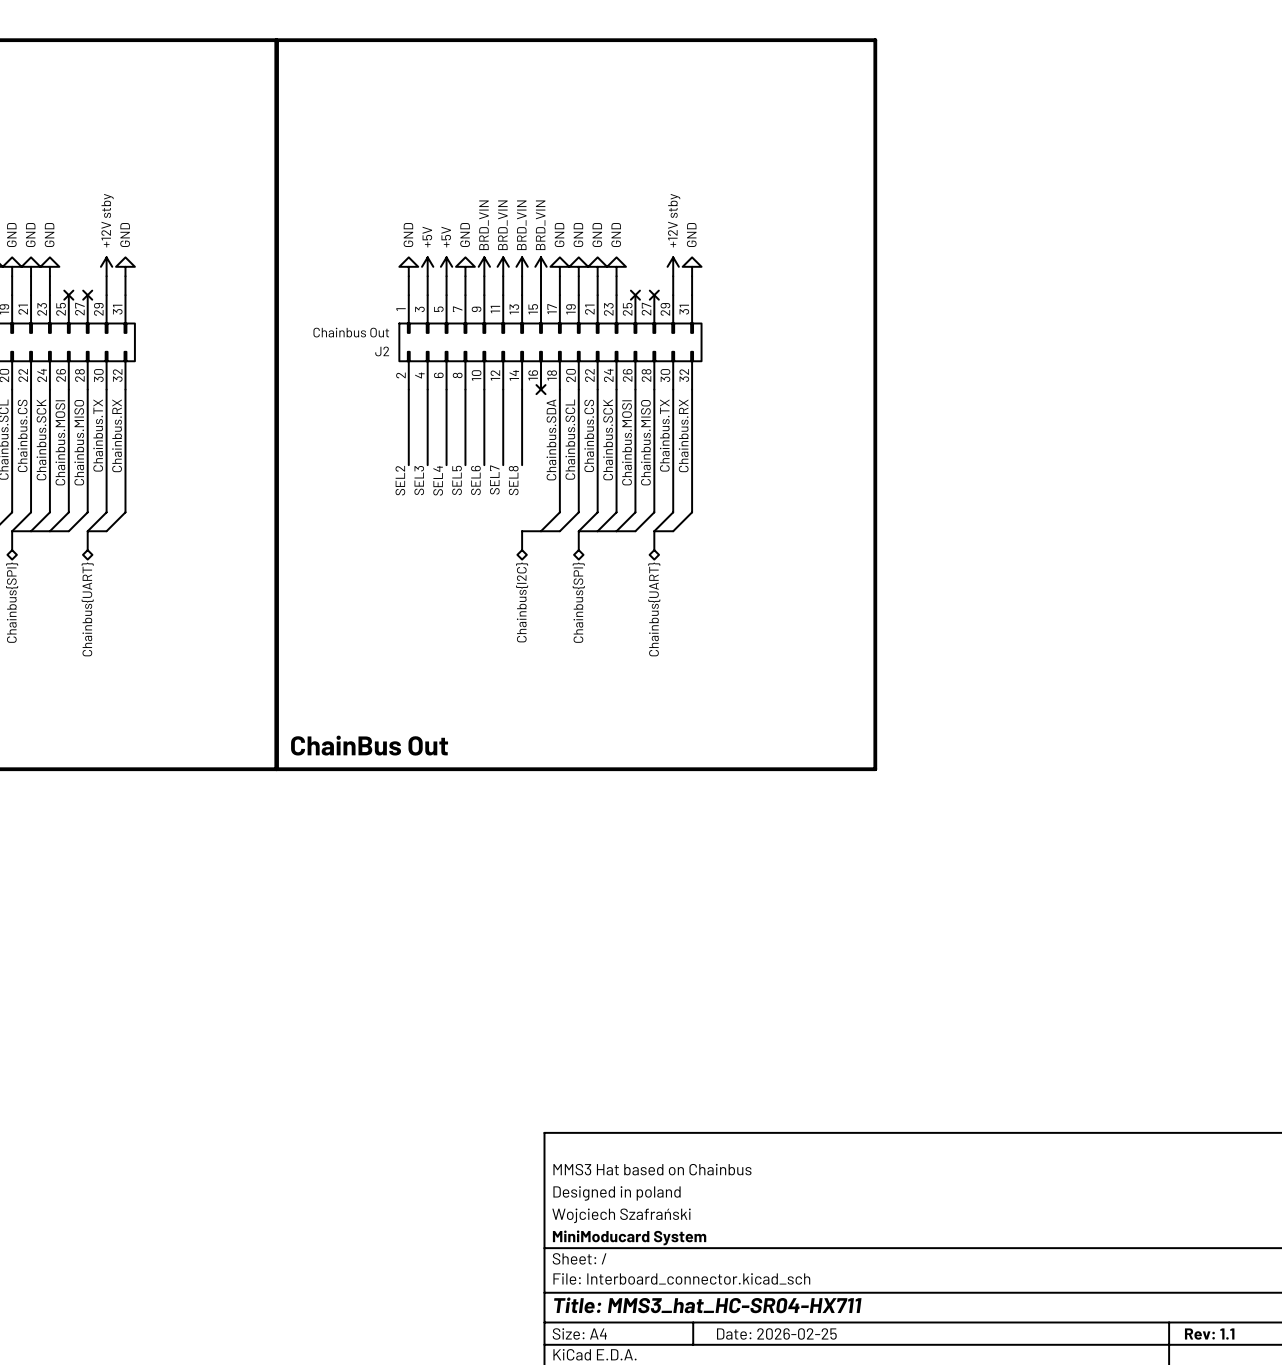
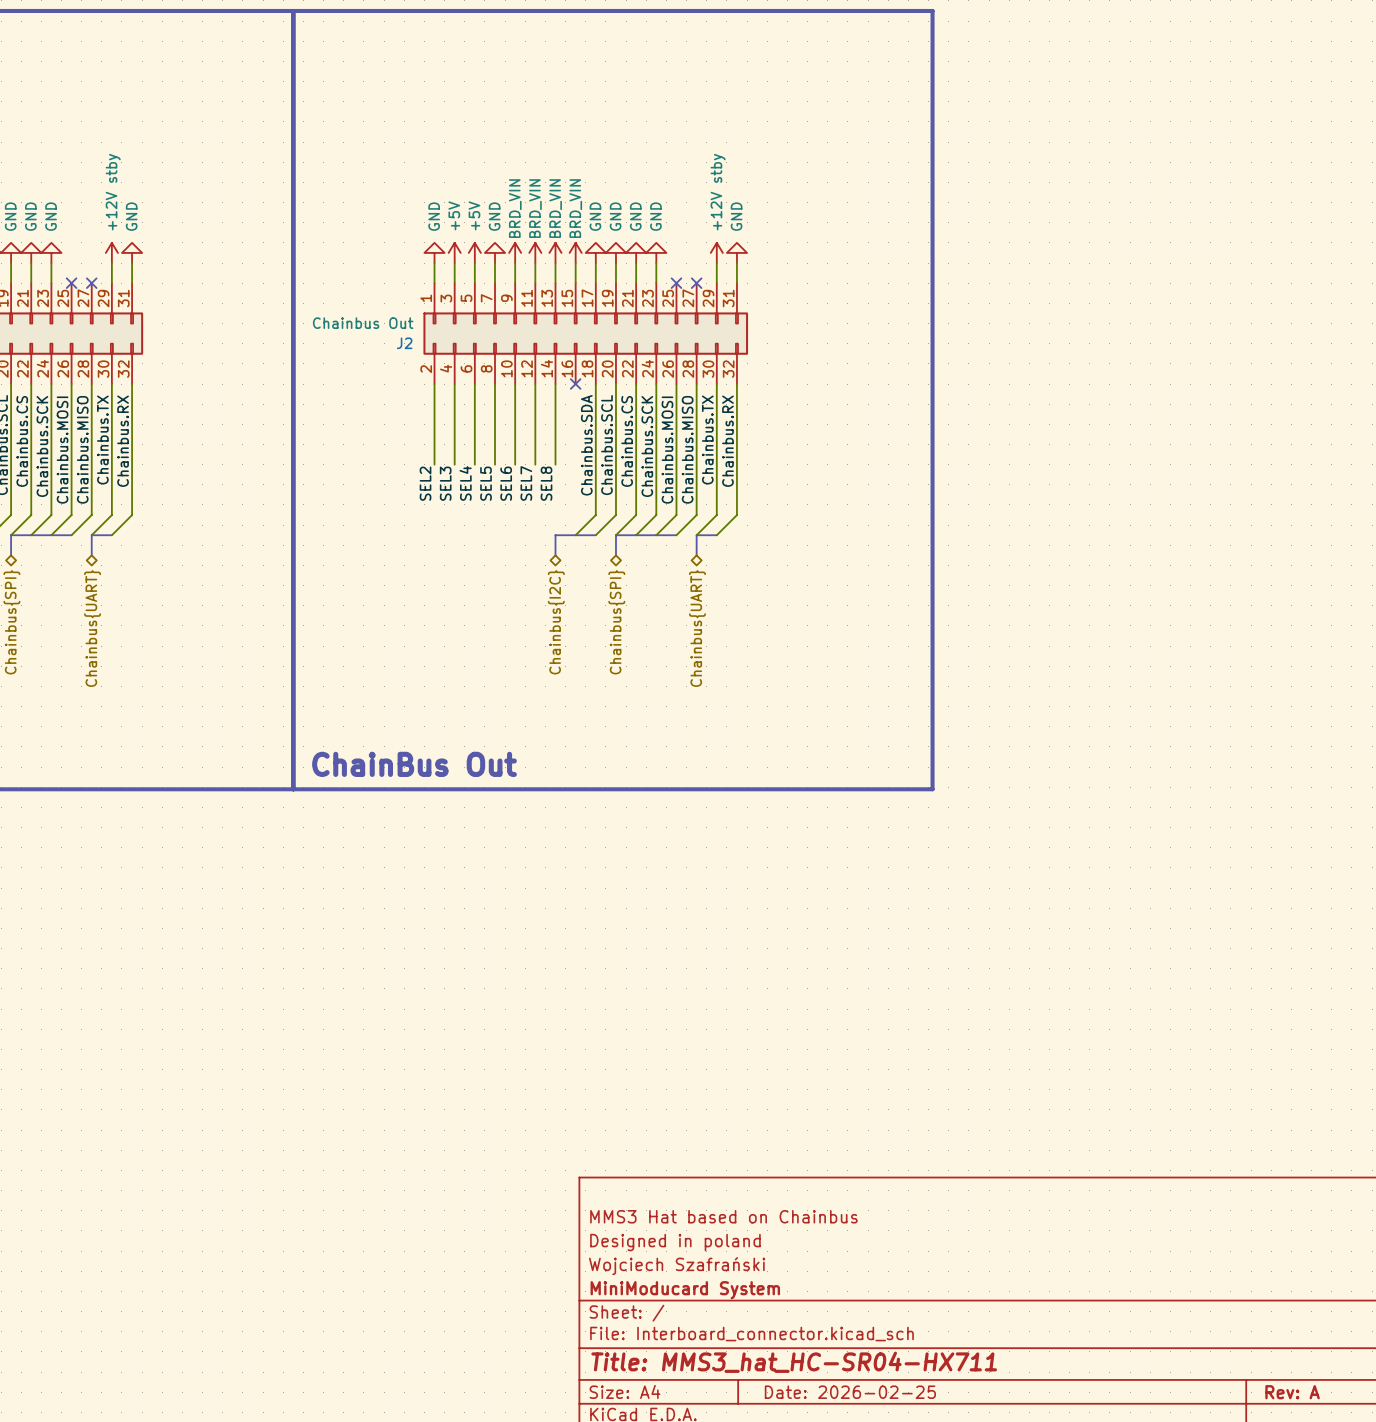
title block: Rev: 1.1 (1209, 1334) -> Rev: A (1292, 1392)

